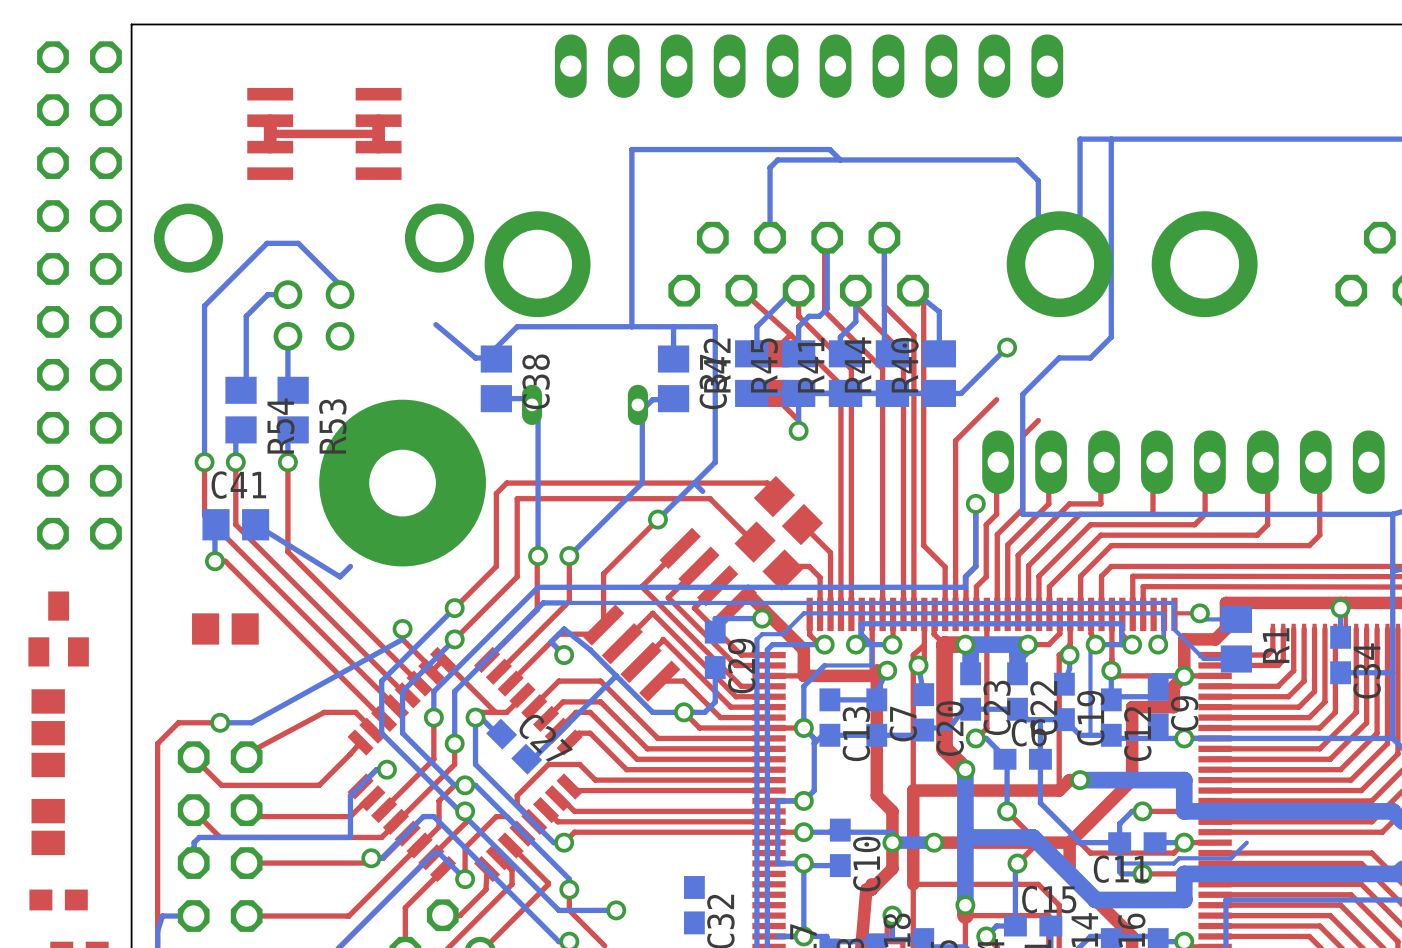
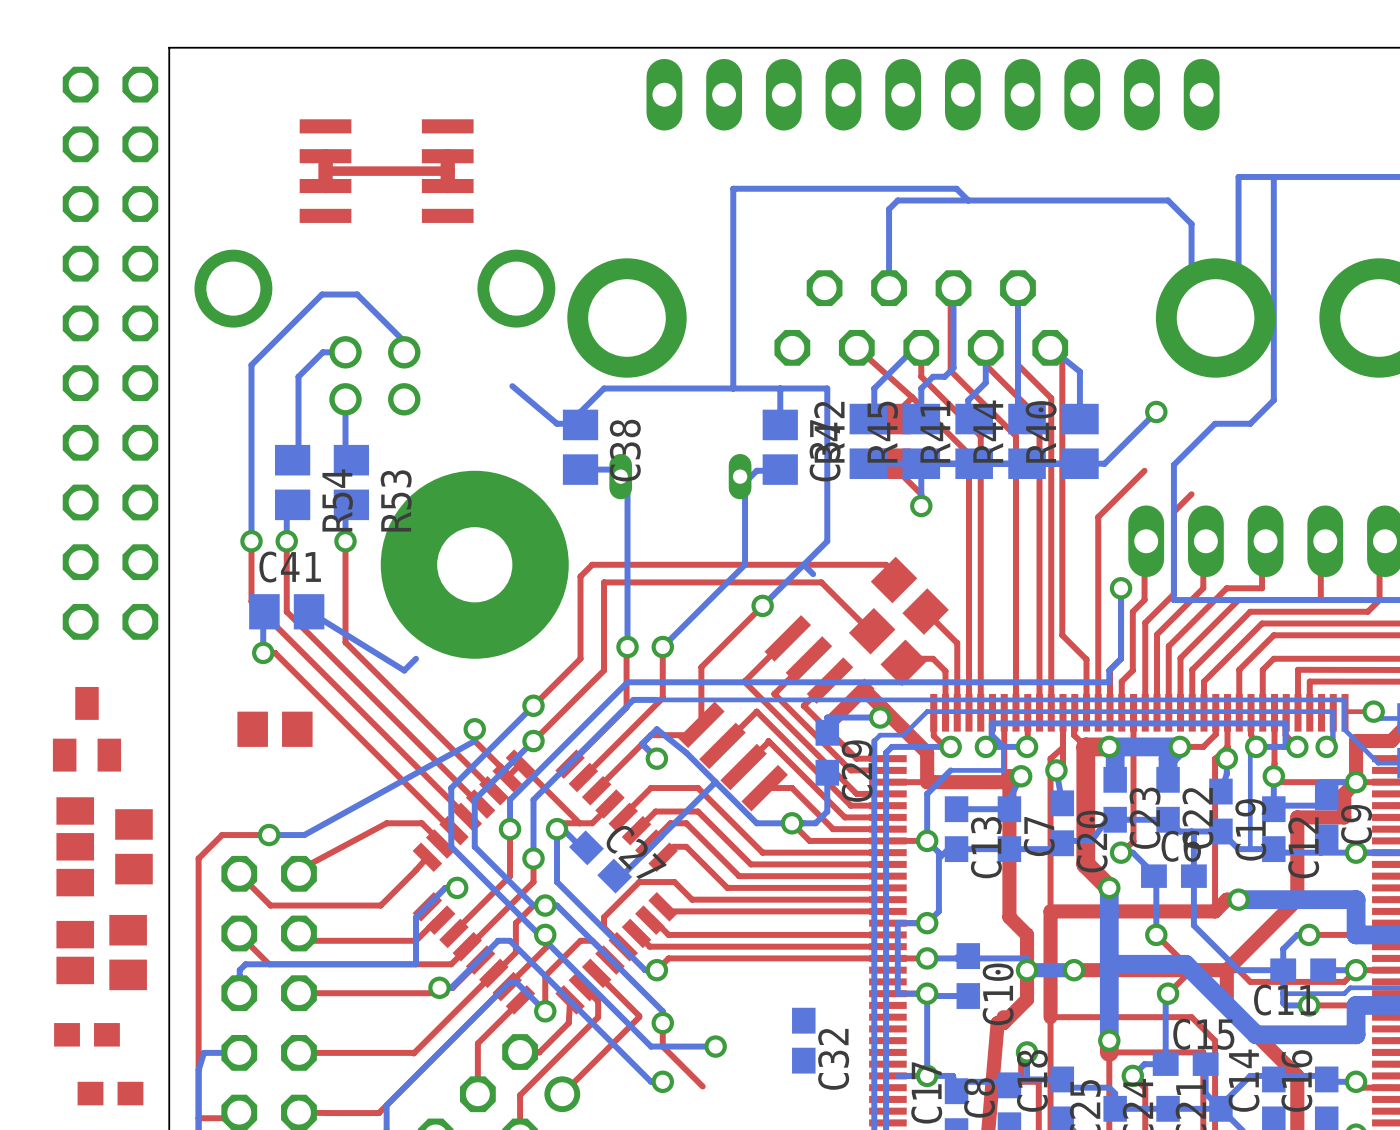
part: none -> (133, 846)
part: none -> (128, 952)

